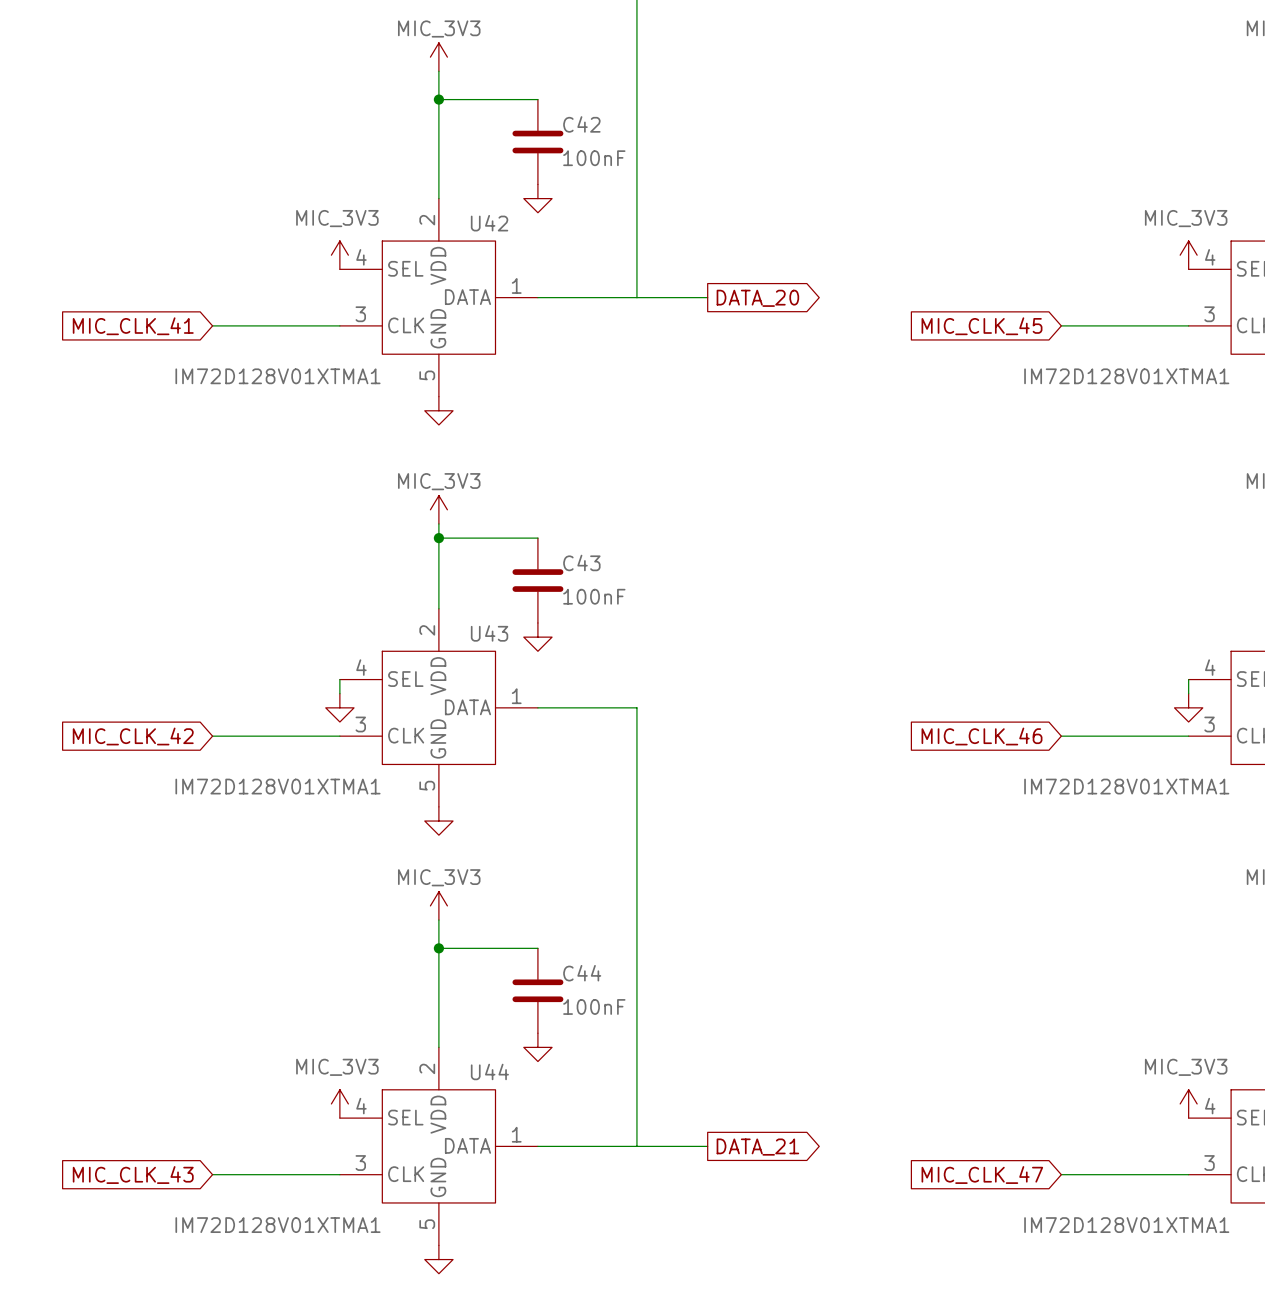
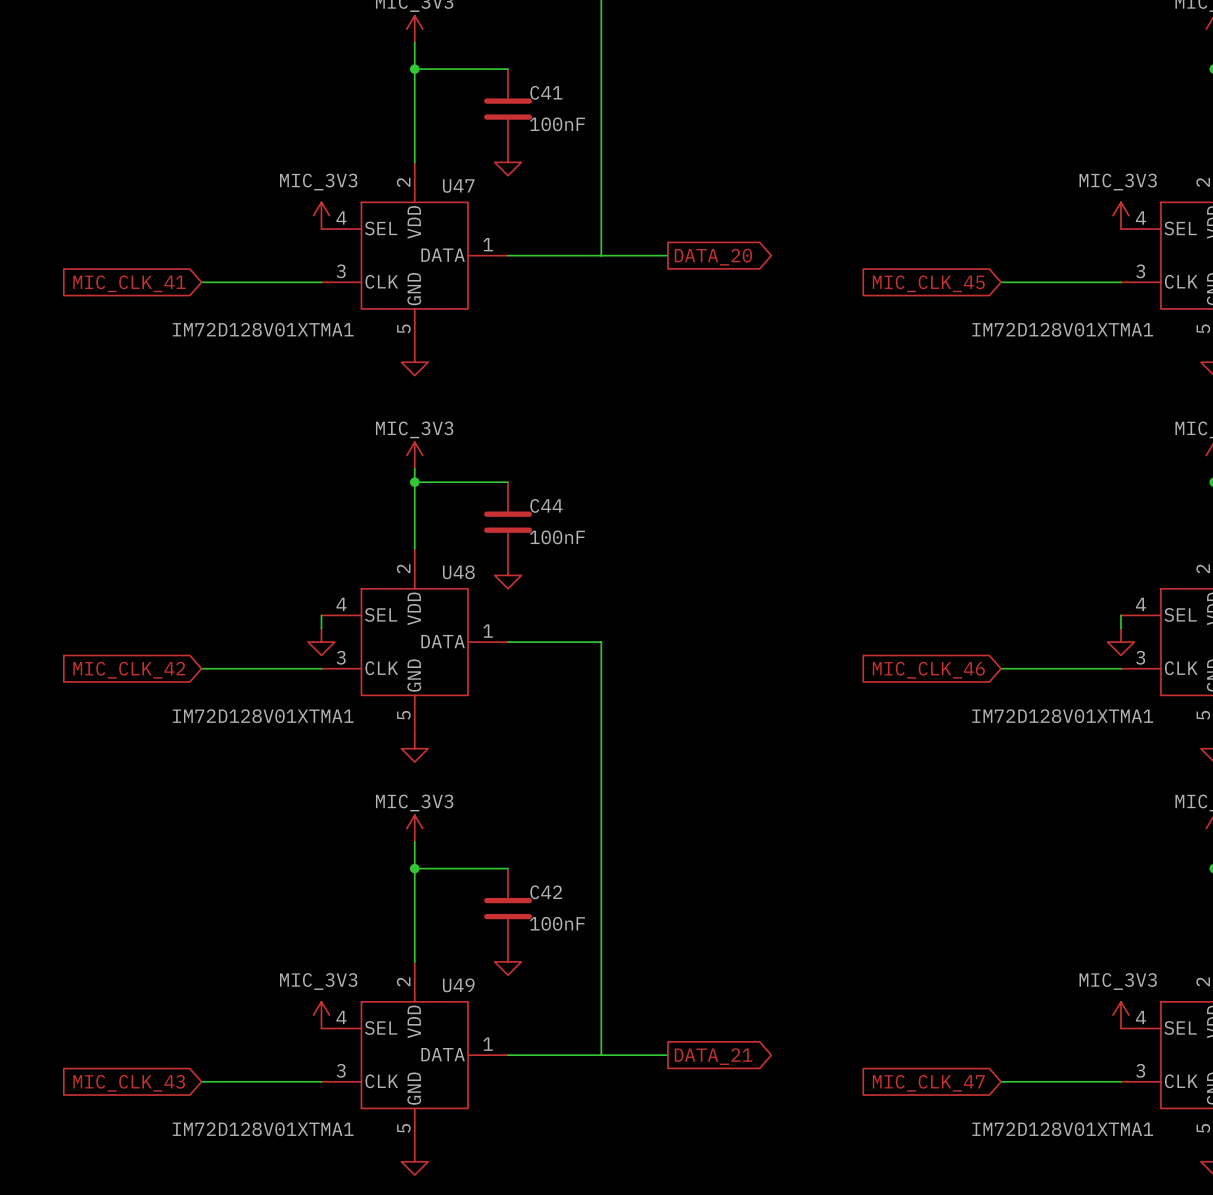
C42 name: C42 (581, 124) -> C41 (546, 92)
U42 name: U42 (489, 223) -> U47 (458, 185)
C43 name: C43 (581, 562) -> C44 (546, 505)
U43 name: U43 (489, 633) -> U48 (458, 572)
C44 name: C44 (582, 973) -> C42 (546, 892)
U44 name: U44 (489, 1071) -> U49 (458, 985)

